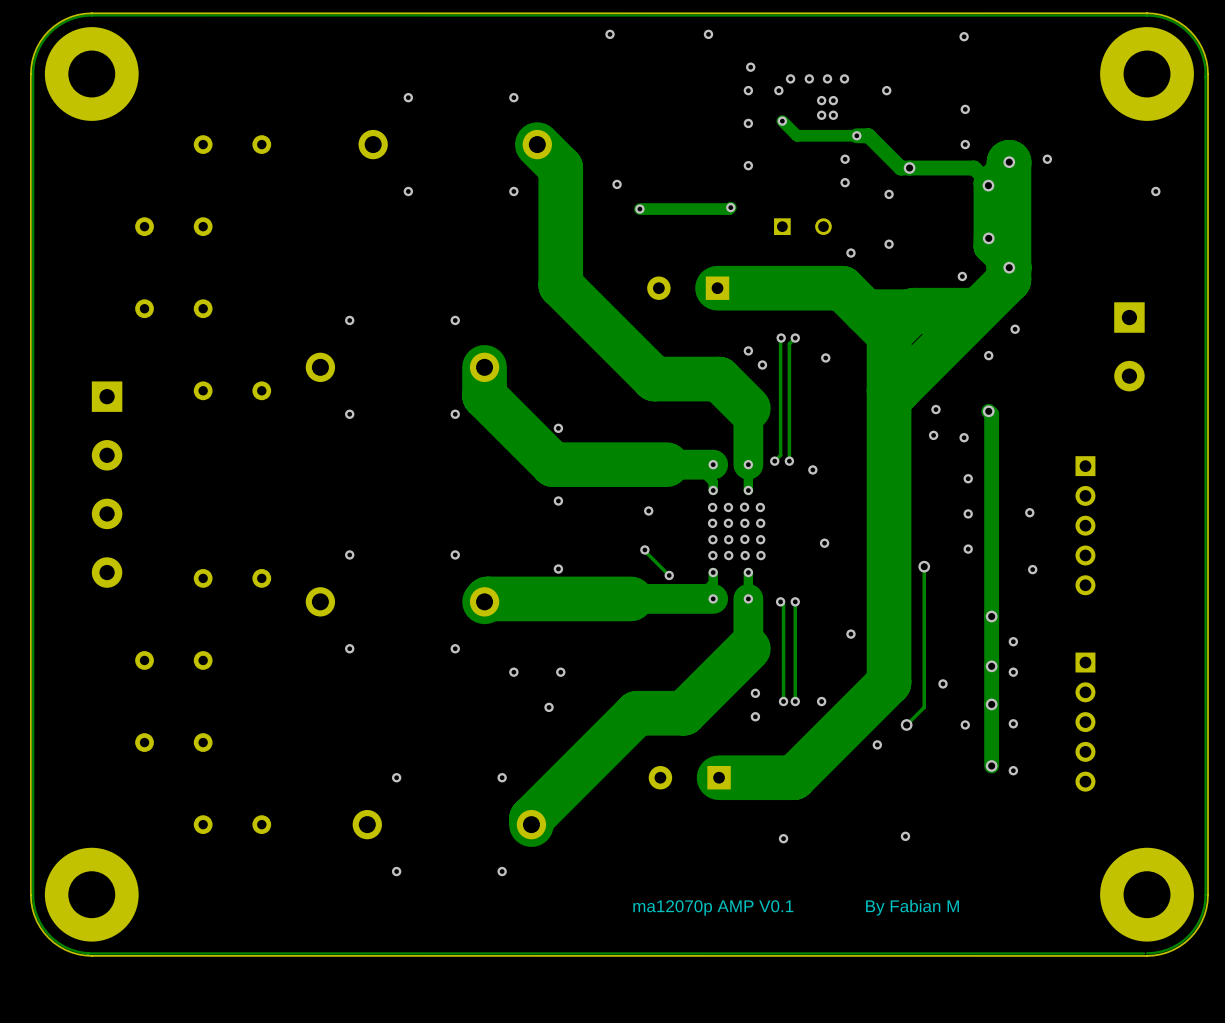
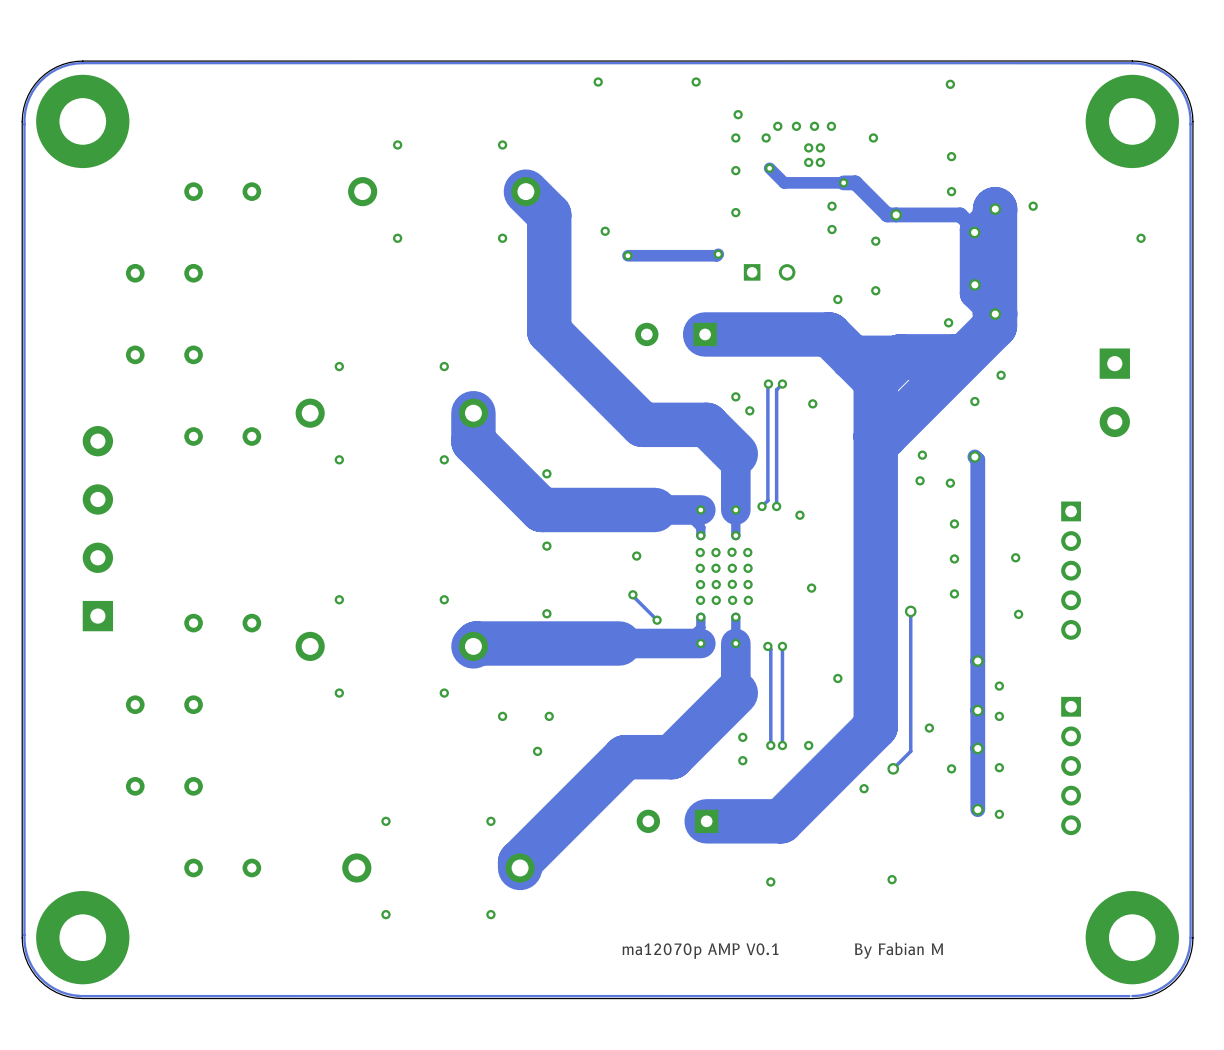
part: none -> (769, 272)
part: (802, 226) -> none
part rotation: 0° (107, 484) -> 180° (97, 528)

